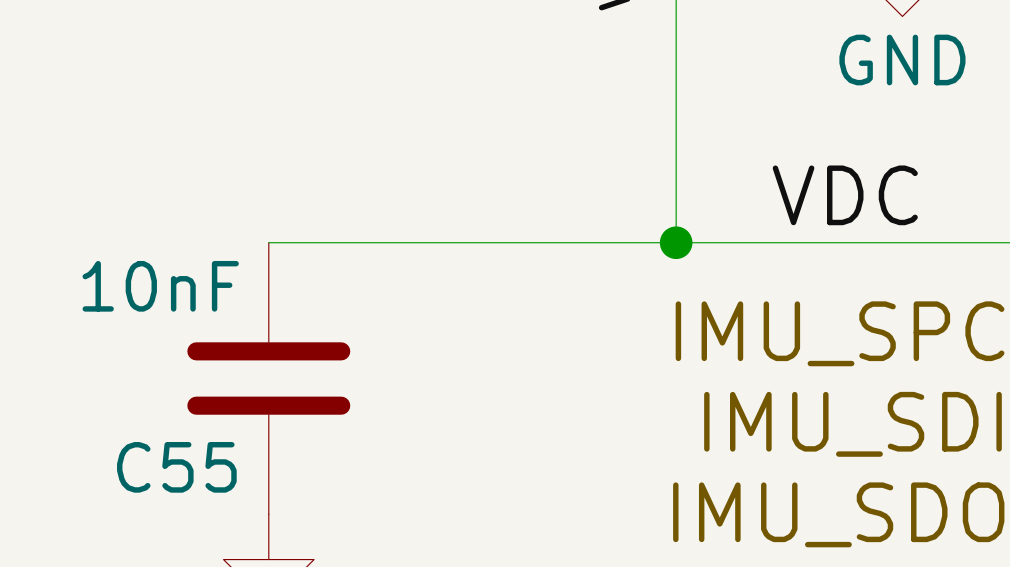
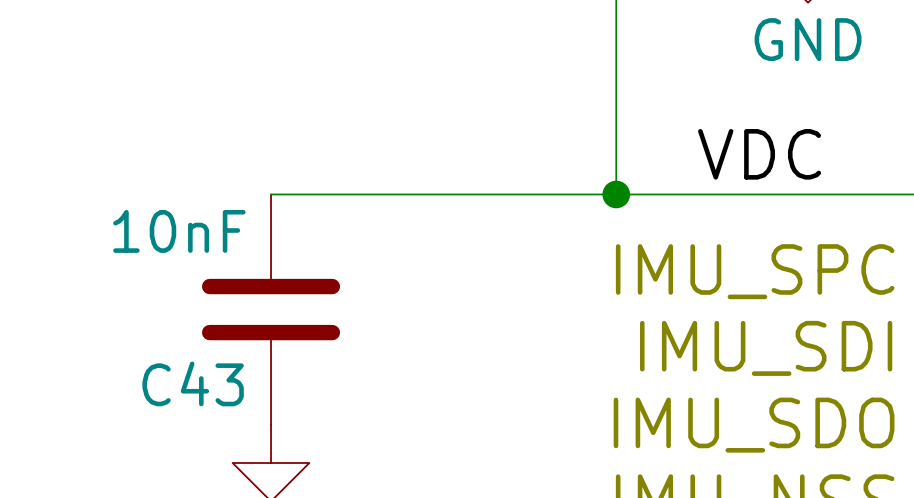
C55 name: C55 (176, 467) -> C43 (193, 383)

